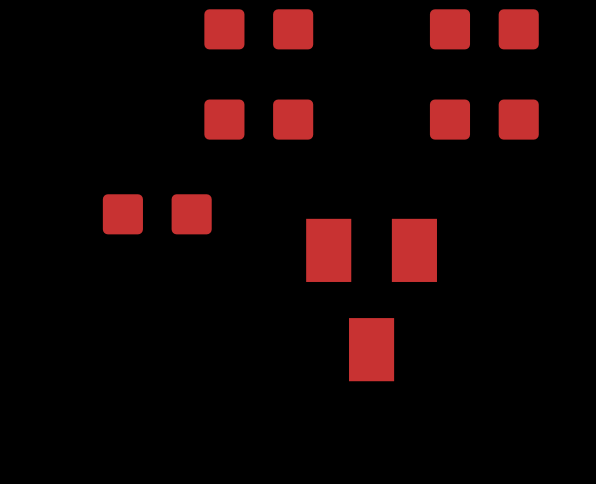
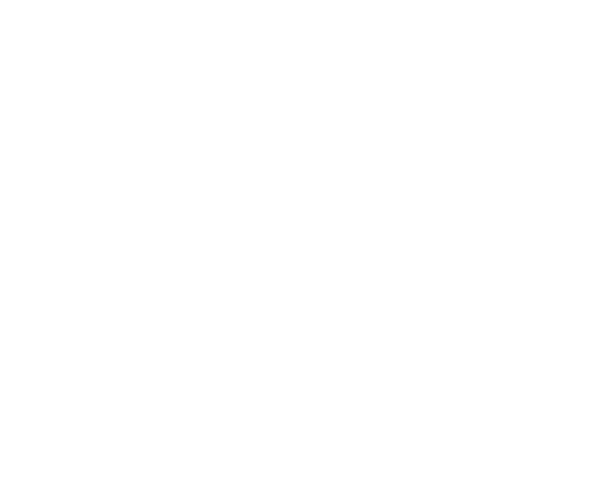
part: (258, 29) -> none
part: (484, 29) -> none
part: (258, 119) -> none
part: (484, 119) -> none
part: (157, 214) -> none
part: (371, 300) -> none

